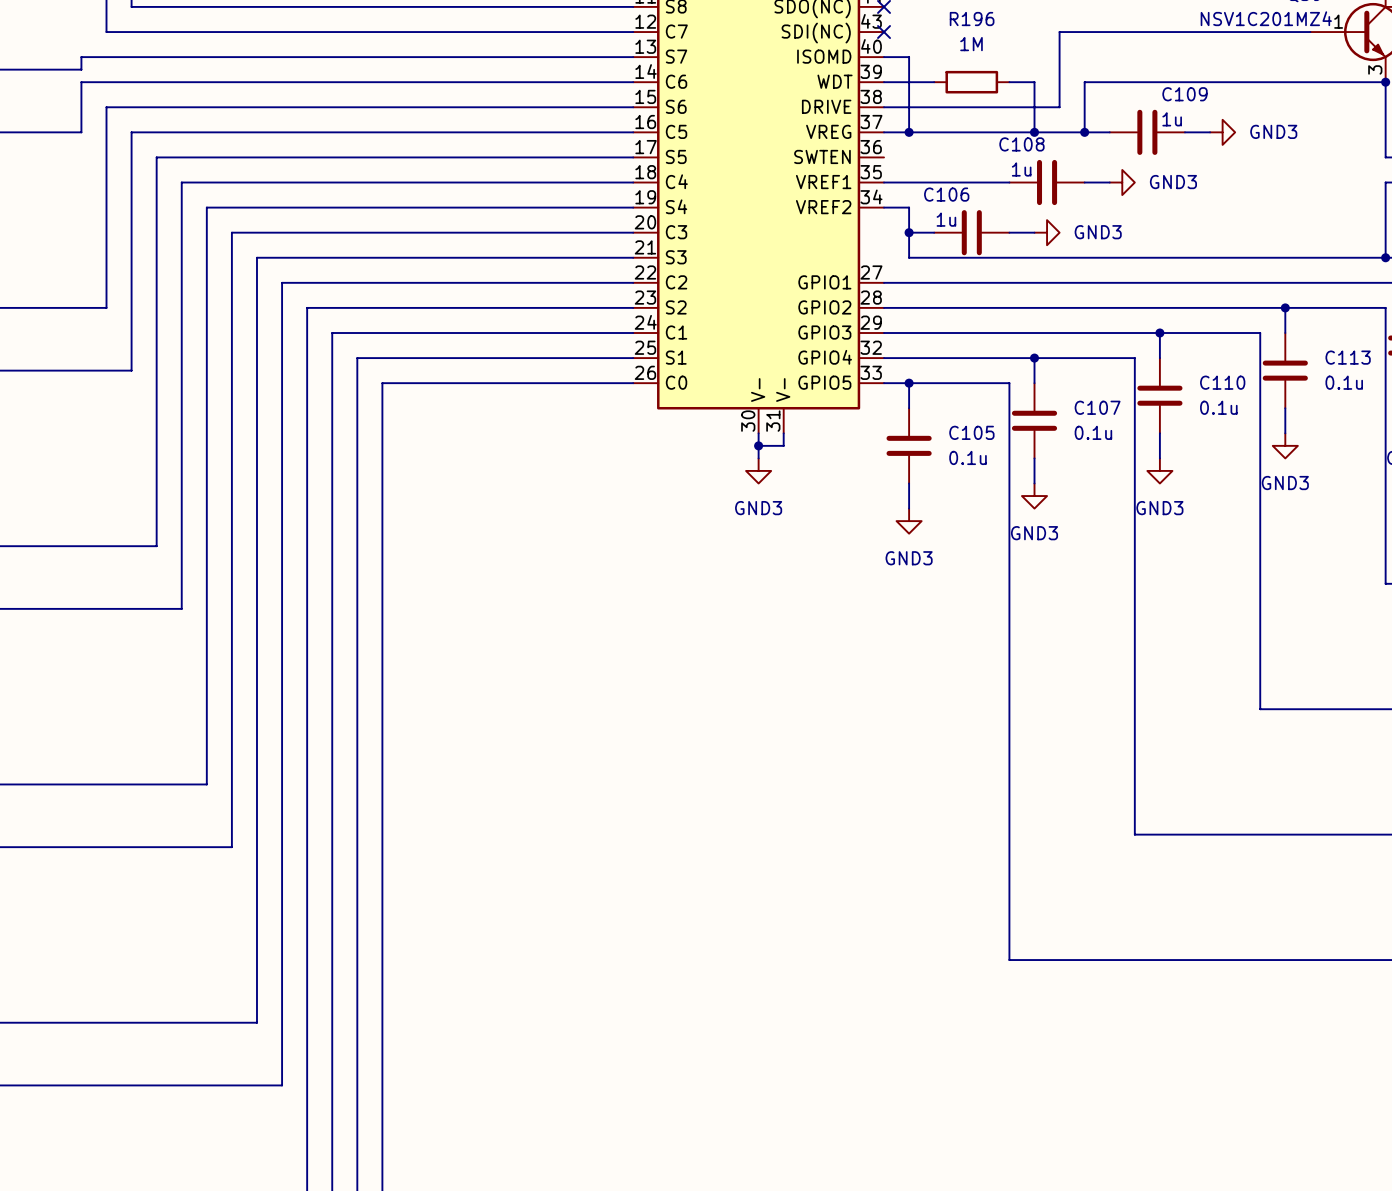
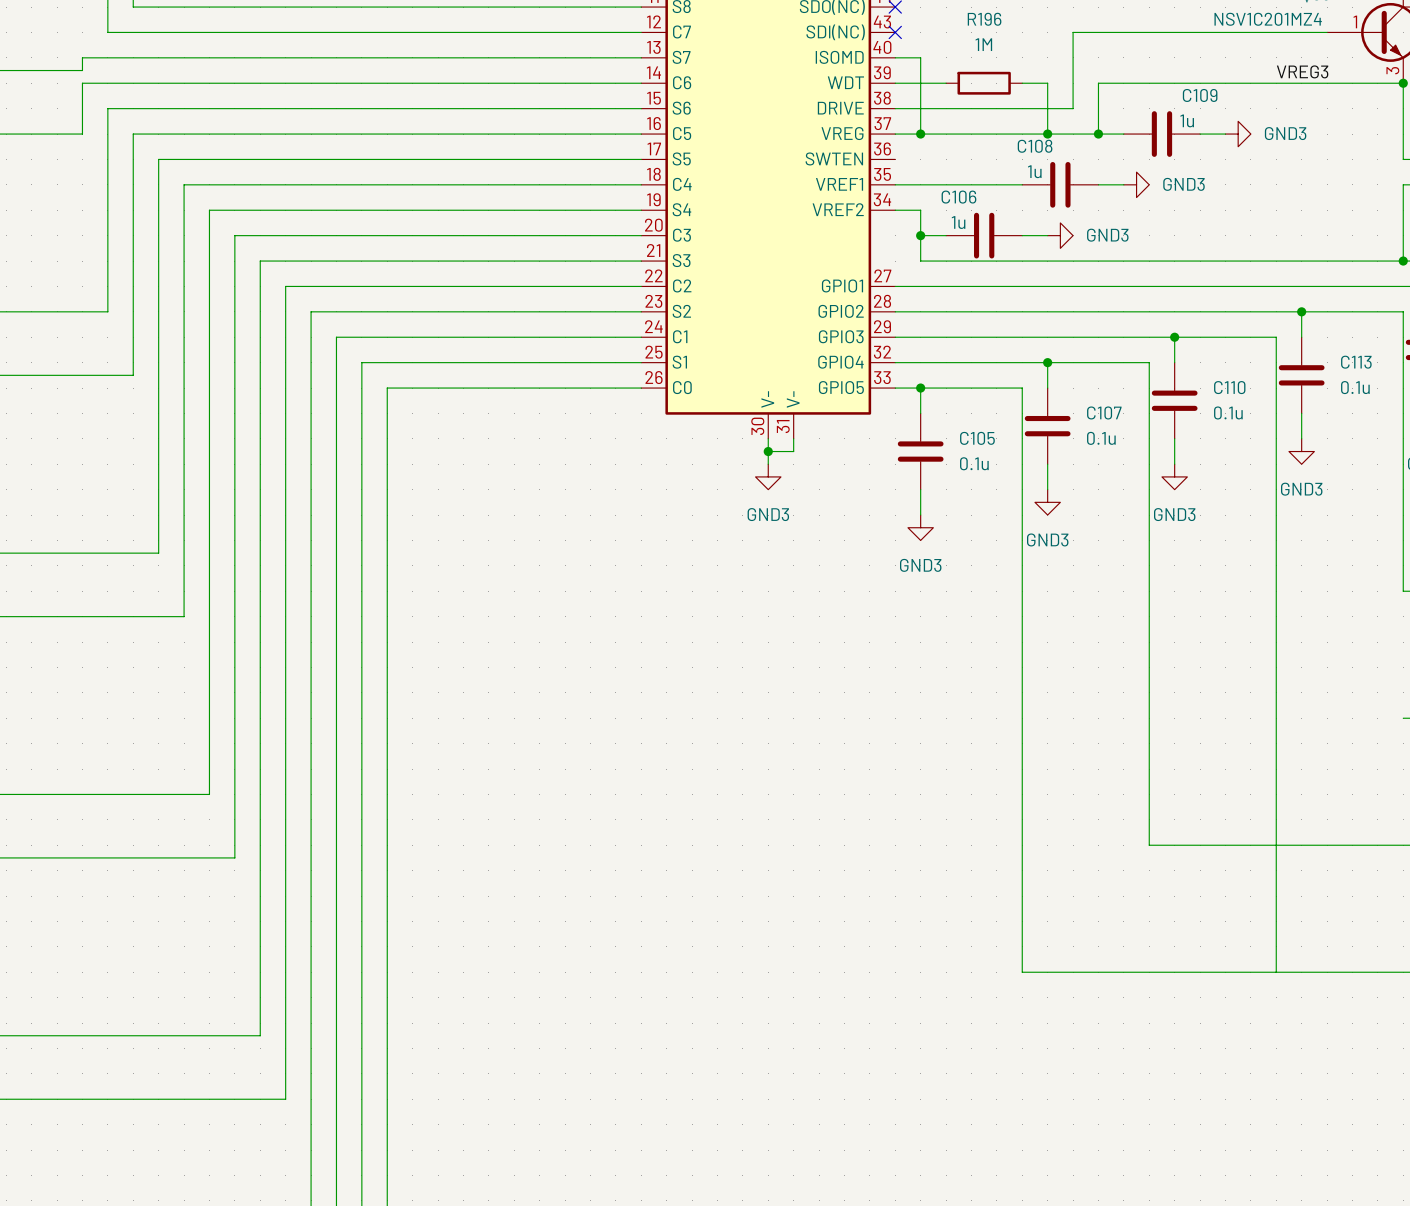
label: none -> VREG3 (1302, 71)
wire: (1260, 709) (1385, 709) -> (1276, 718) (1276, 972)

